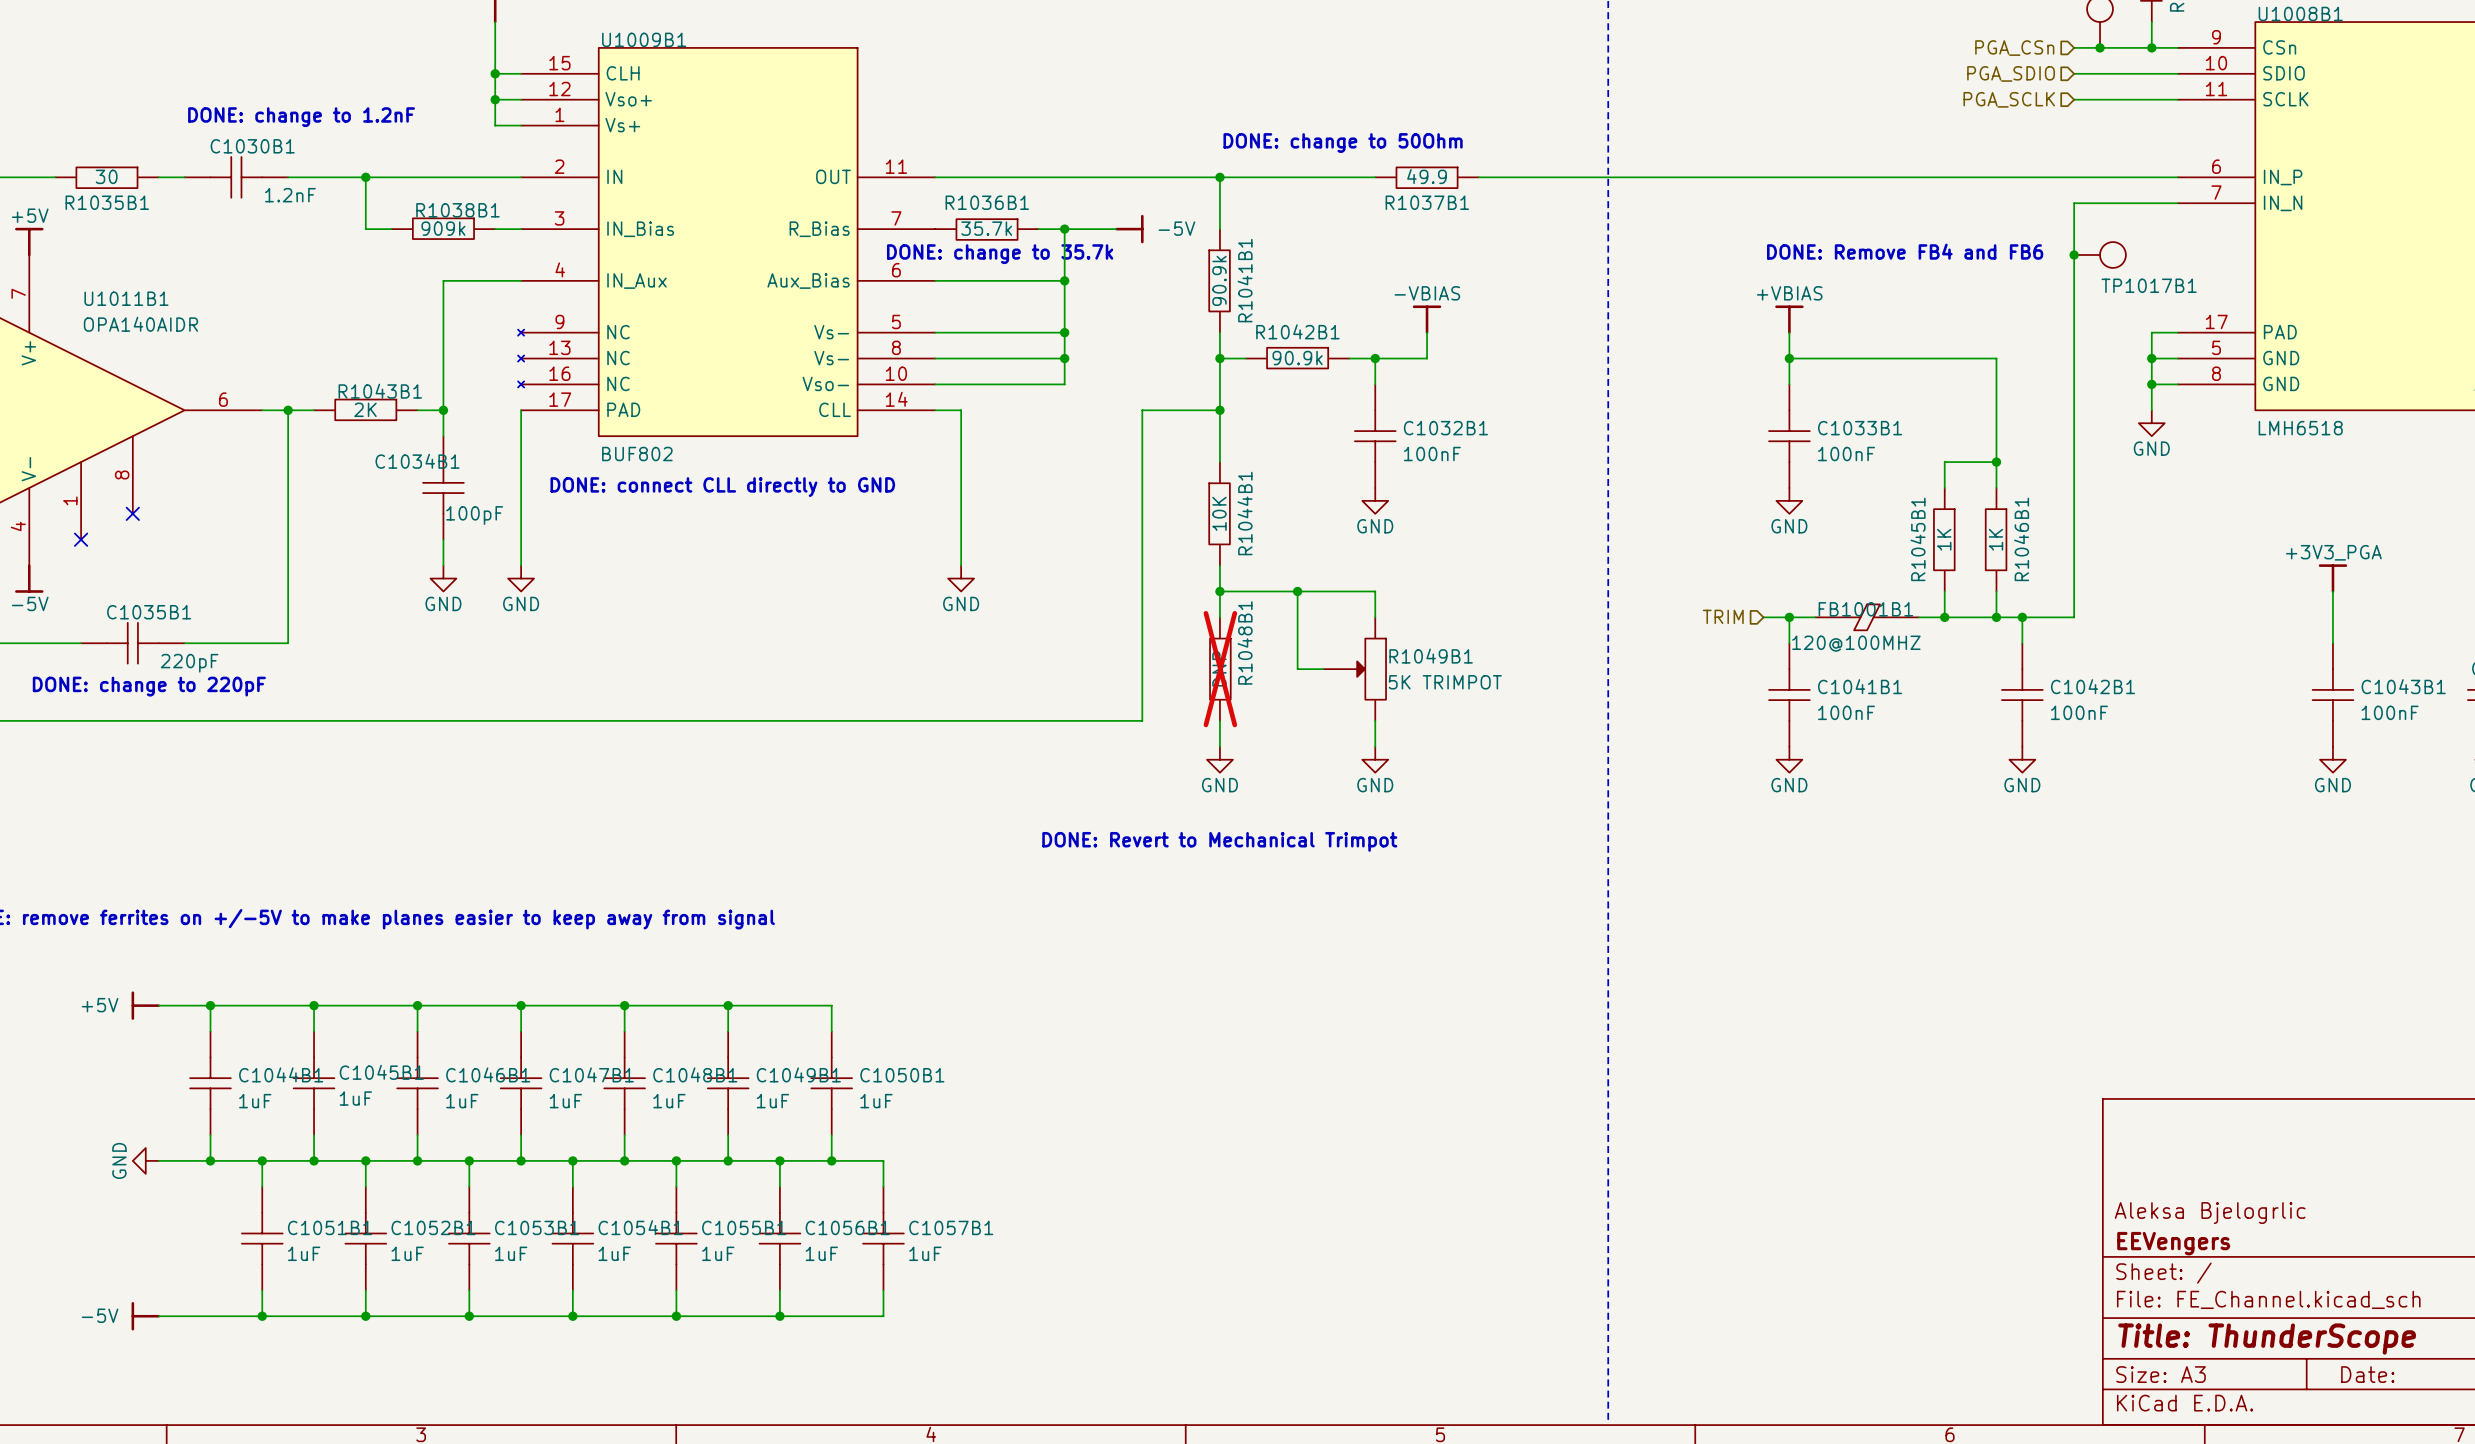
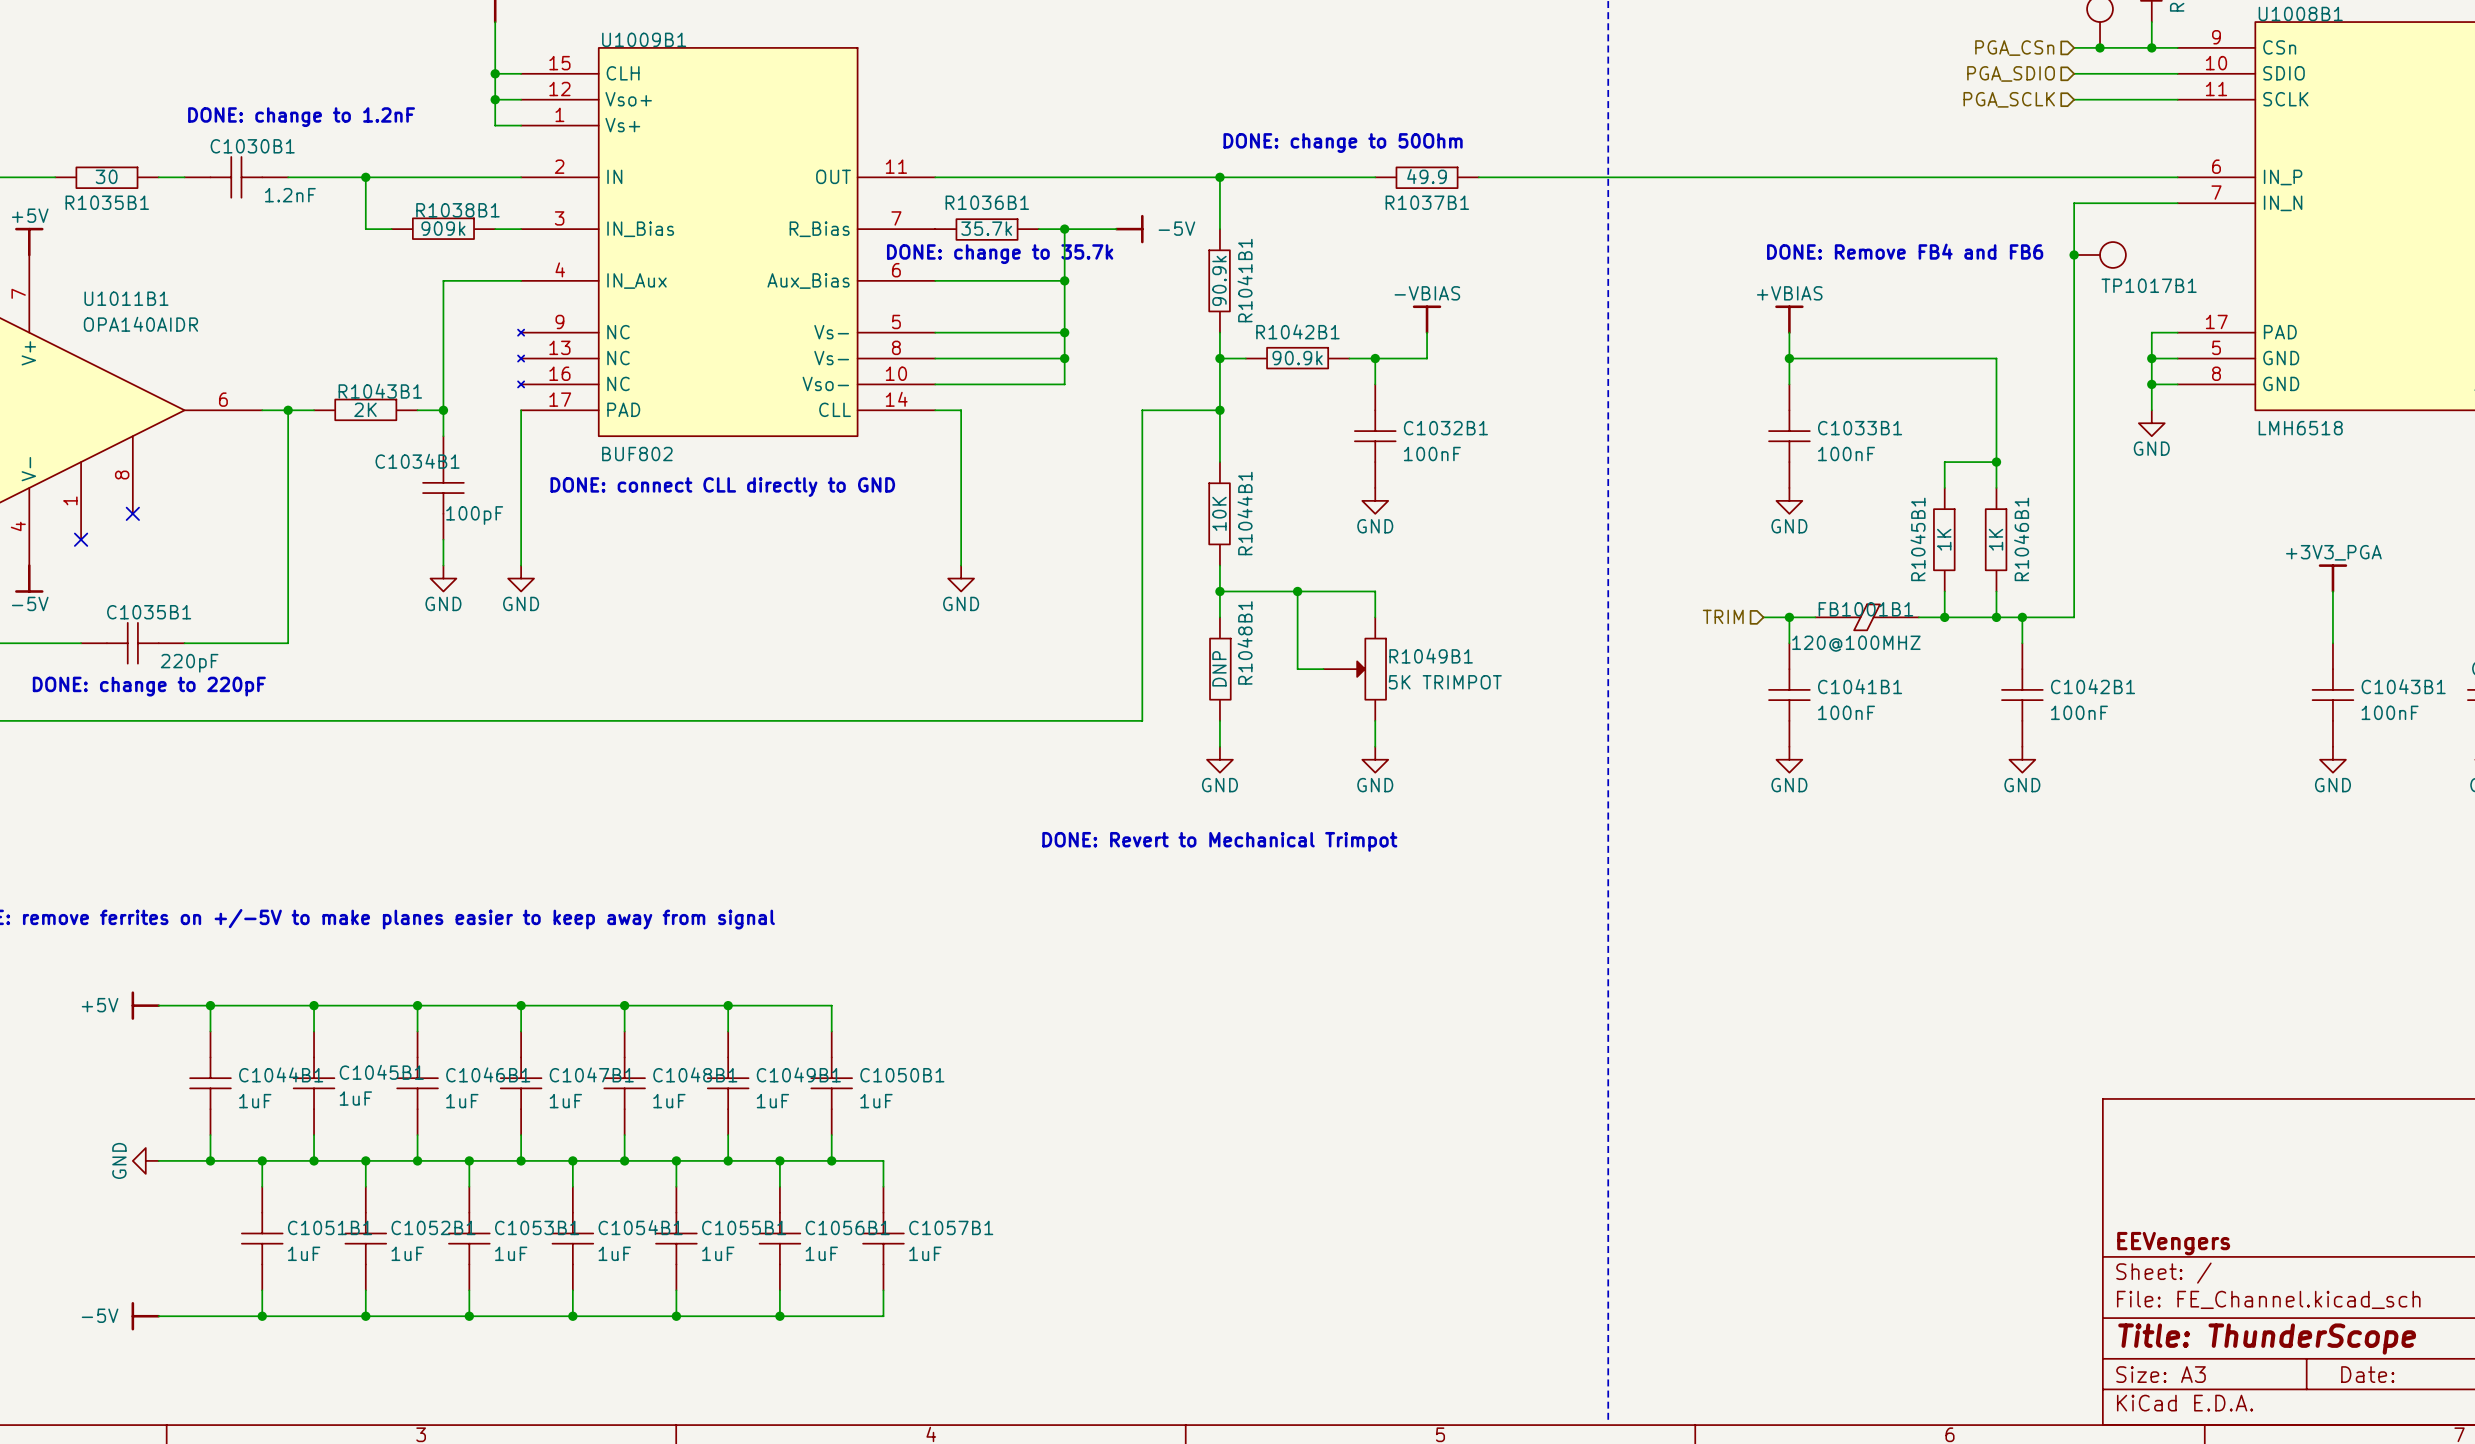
R1048B1 do-not-place cross: (1220, 669) -> none
title block: Aleksa Bjelogrlic (2210, 1213) -> none

